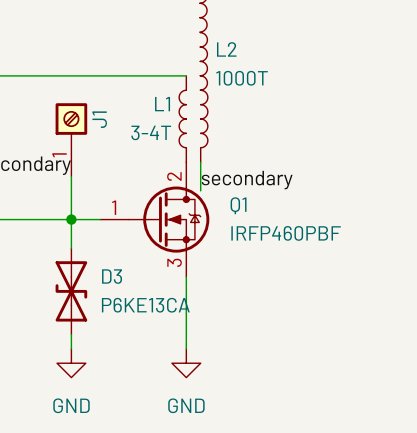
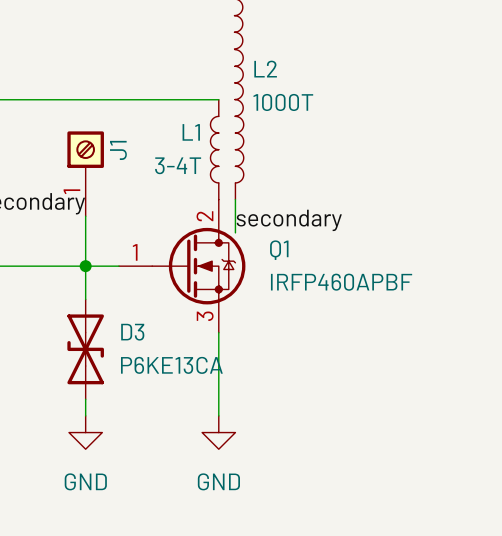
Q1 value: IRFP460PBF (286, 233) -> IRFP460APBF (341, 282)

